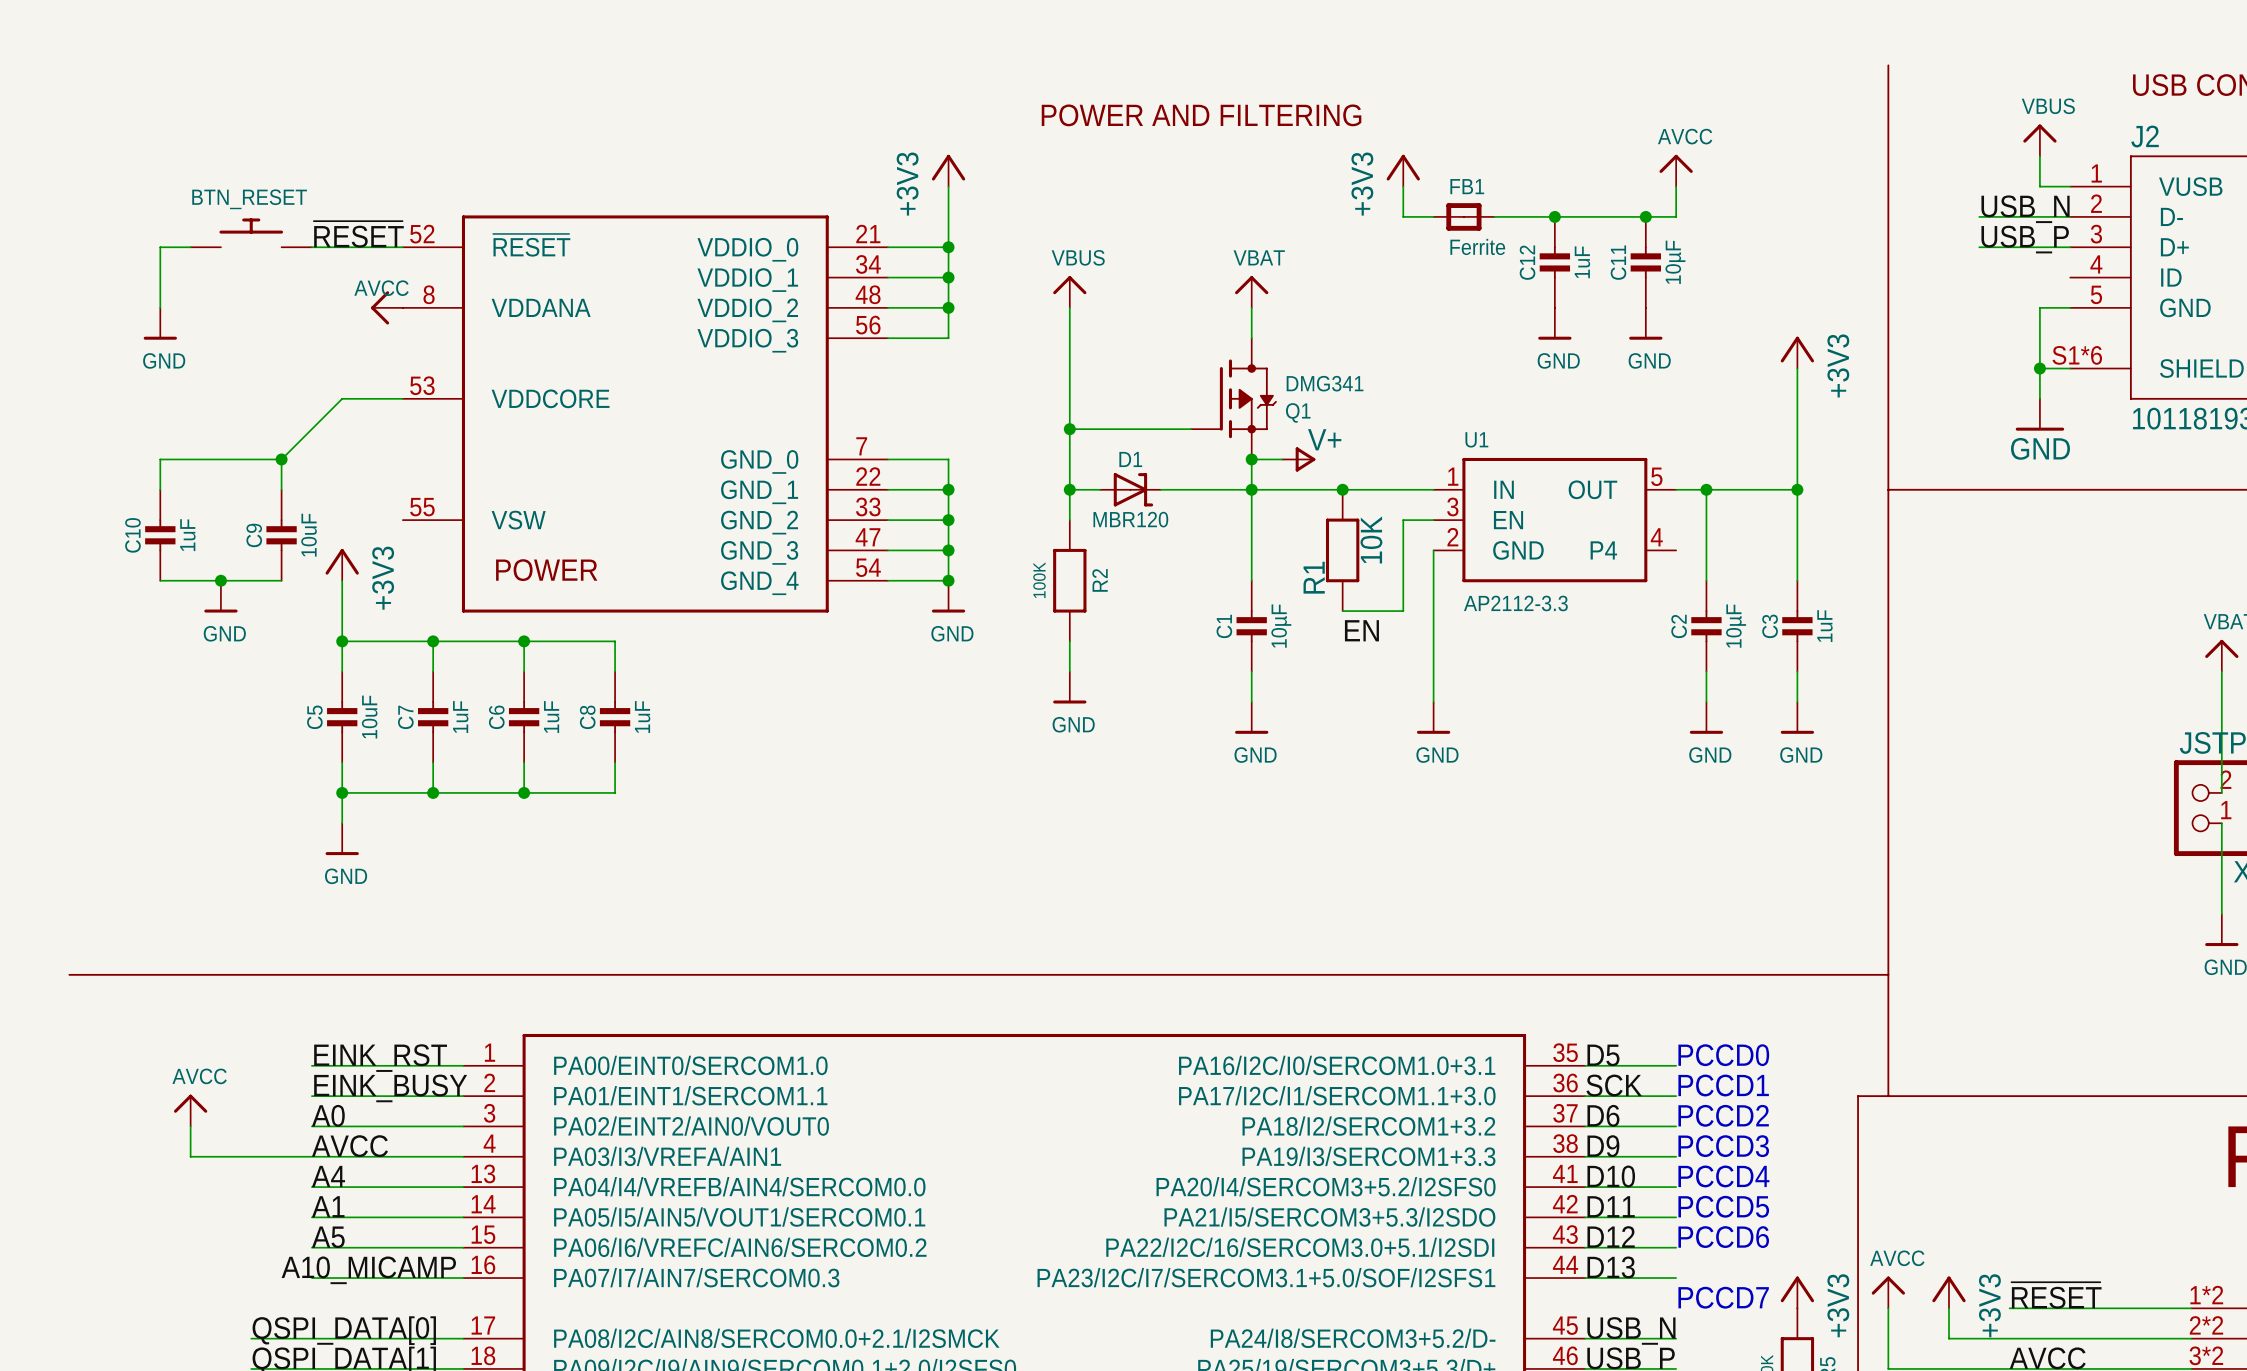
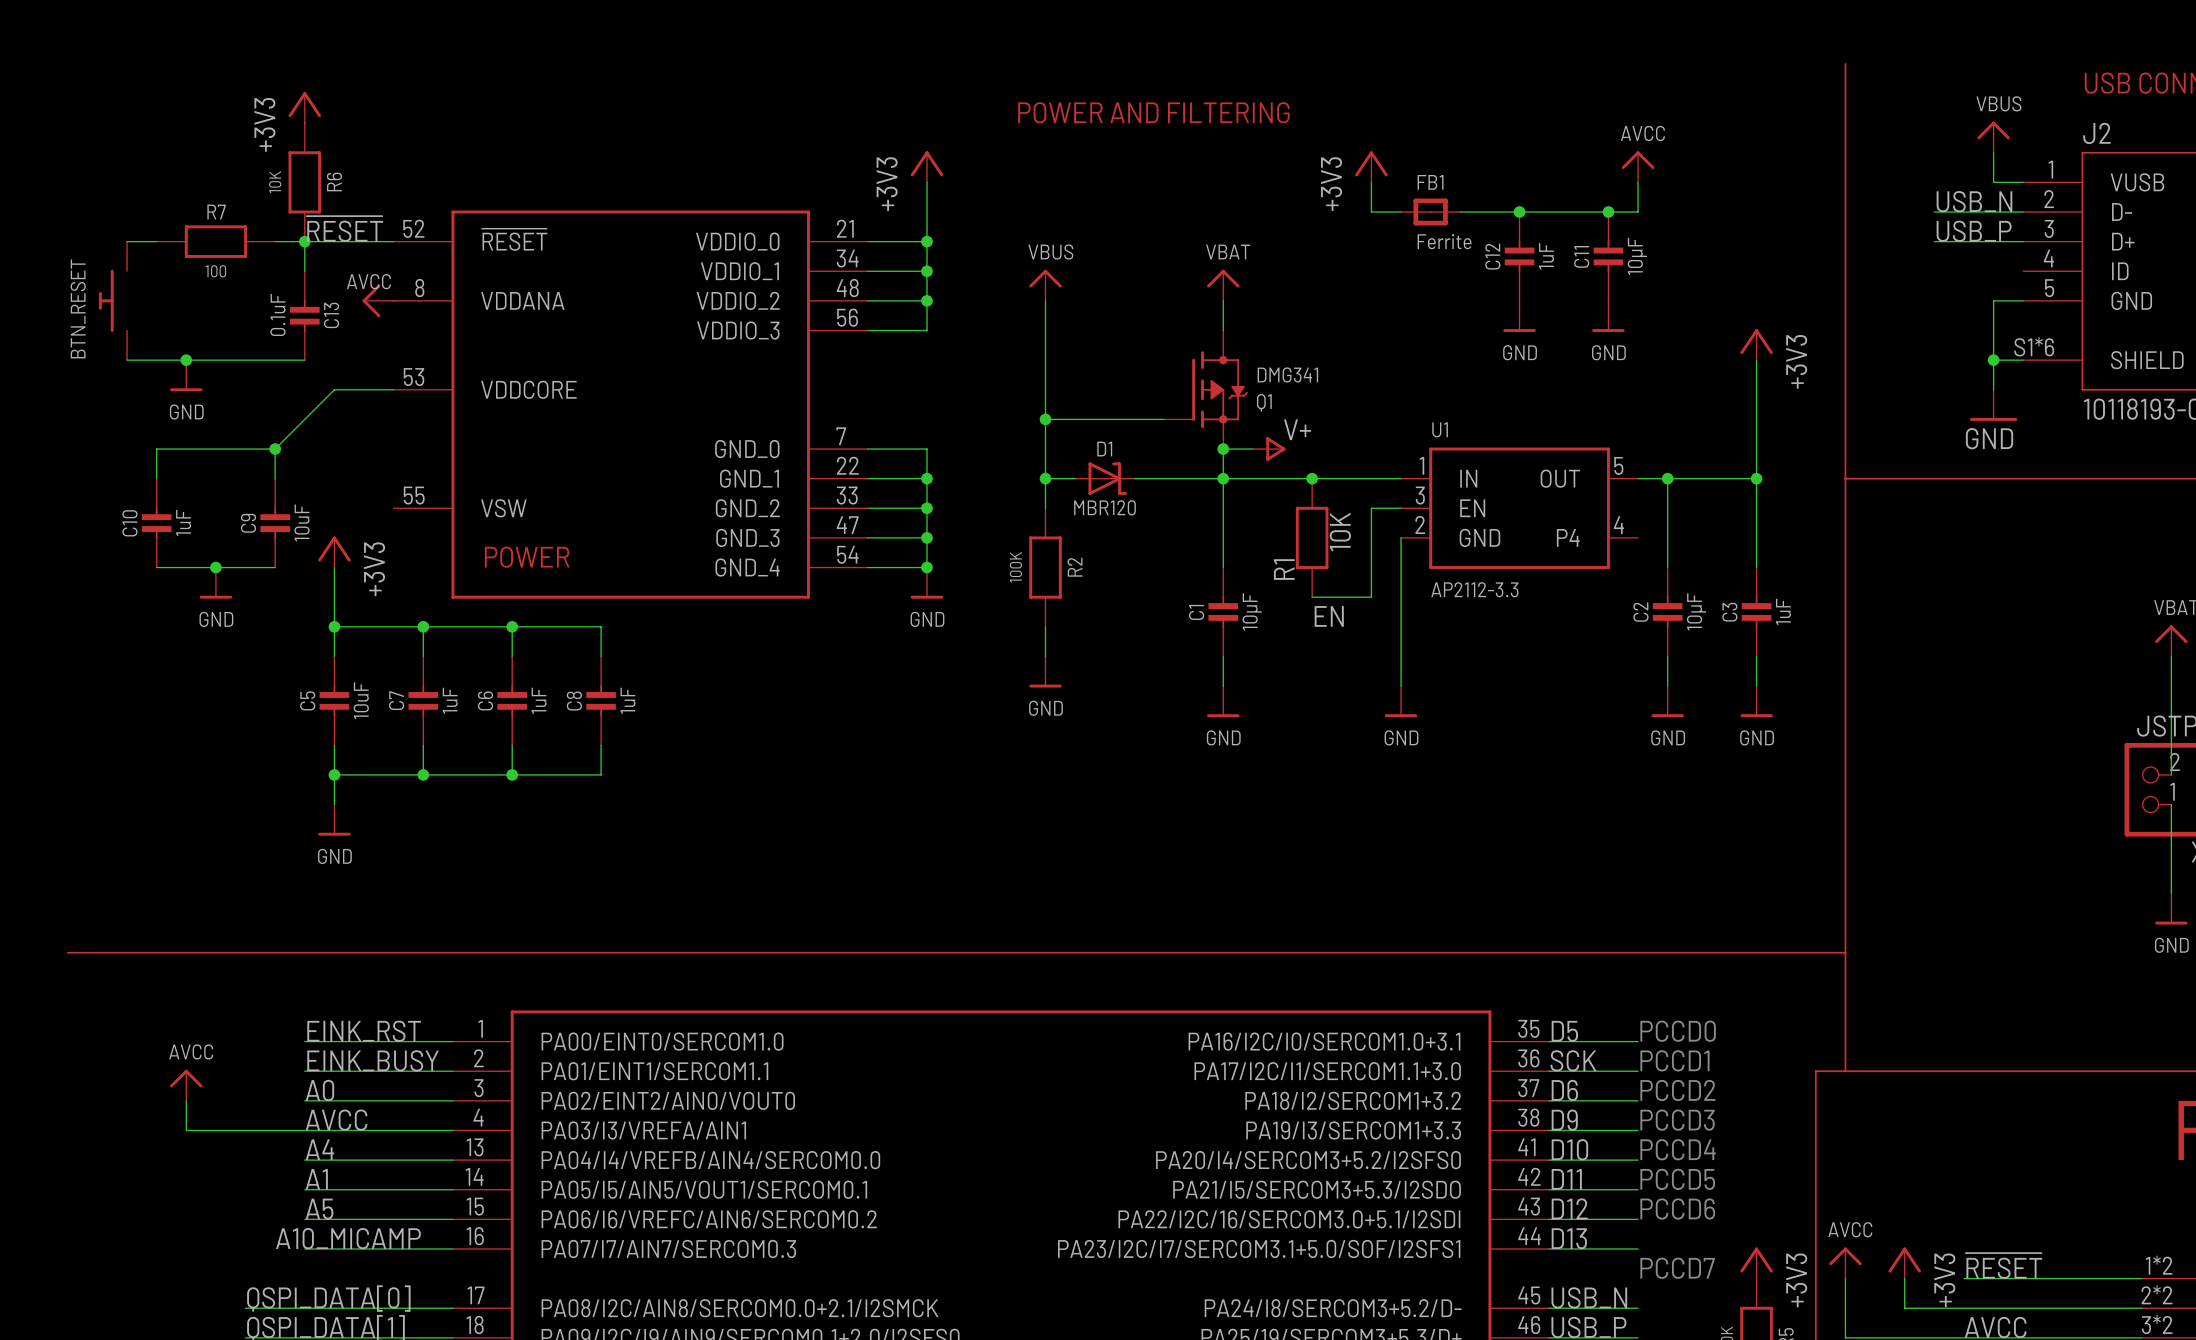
power symbol: none -> +3V3 (304, 107)
R6: none -> 10K (304, 182)
BTN_RESET rotation: 0° (251, 226) -> 90° counterclockwise (106, 300)
BTN_RESET position: (251, 232) -> (112, 300)
wire: none -> (127, 241) (156, 241)
wire: (190, 247) (160, 247) (160, 307) -> none
R7: none -> 100 (215, 241)
wire: none -> (275, 241) (304, 241) (304, 271)
junction: none -> (304, 241)
power symbol position: GND (160, 323) -> GND (186, 375)
C13: none -> 0.1uF (304, 315)
wire: none -> (127, 360) (304, 360)
junction: none -> (186, 360)

